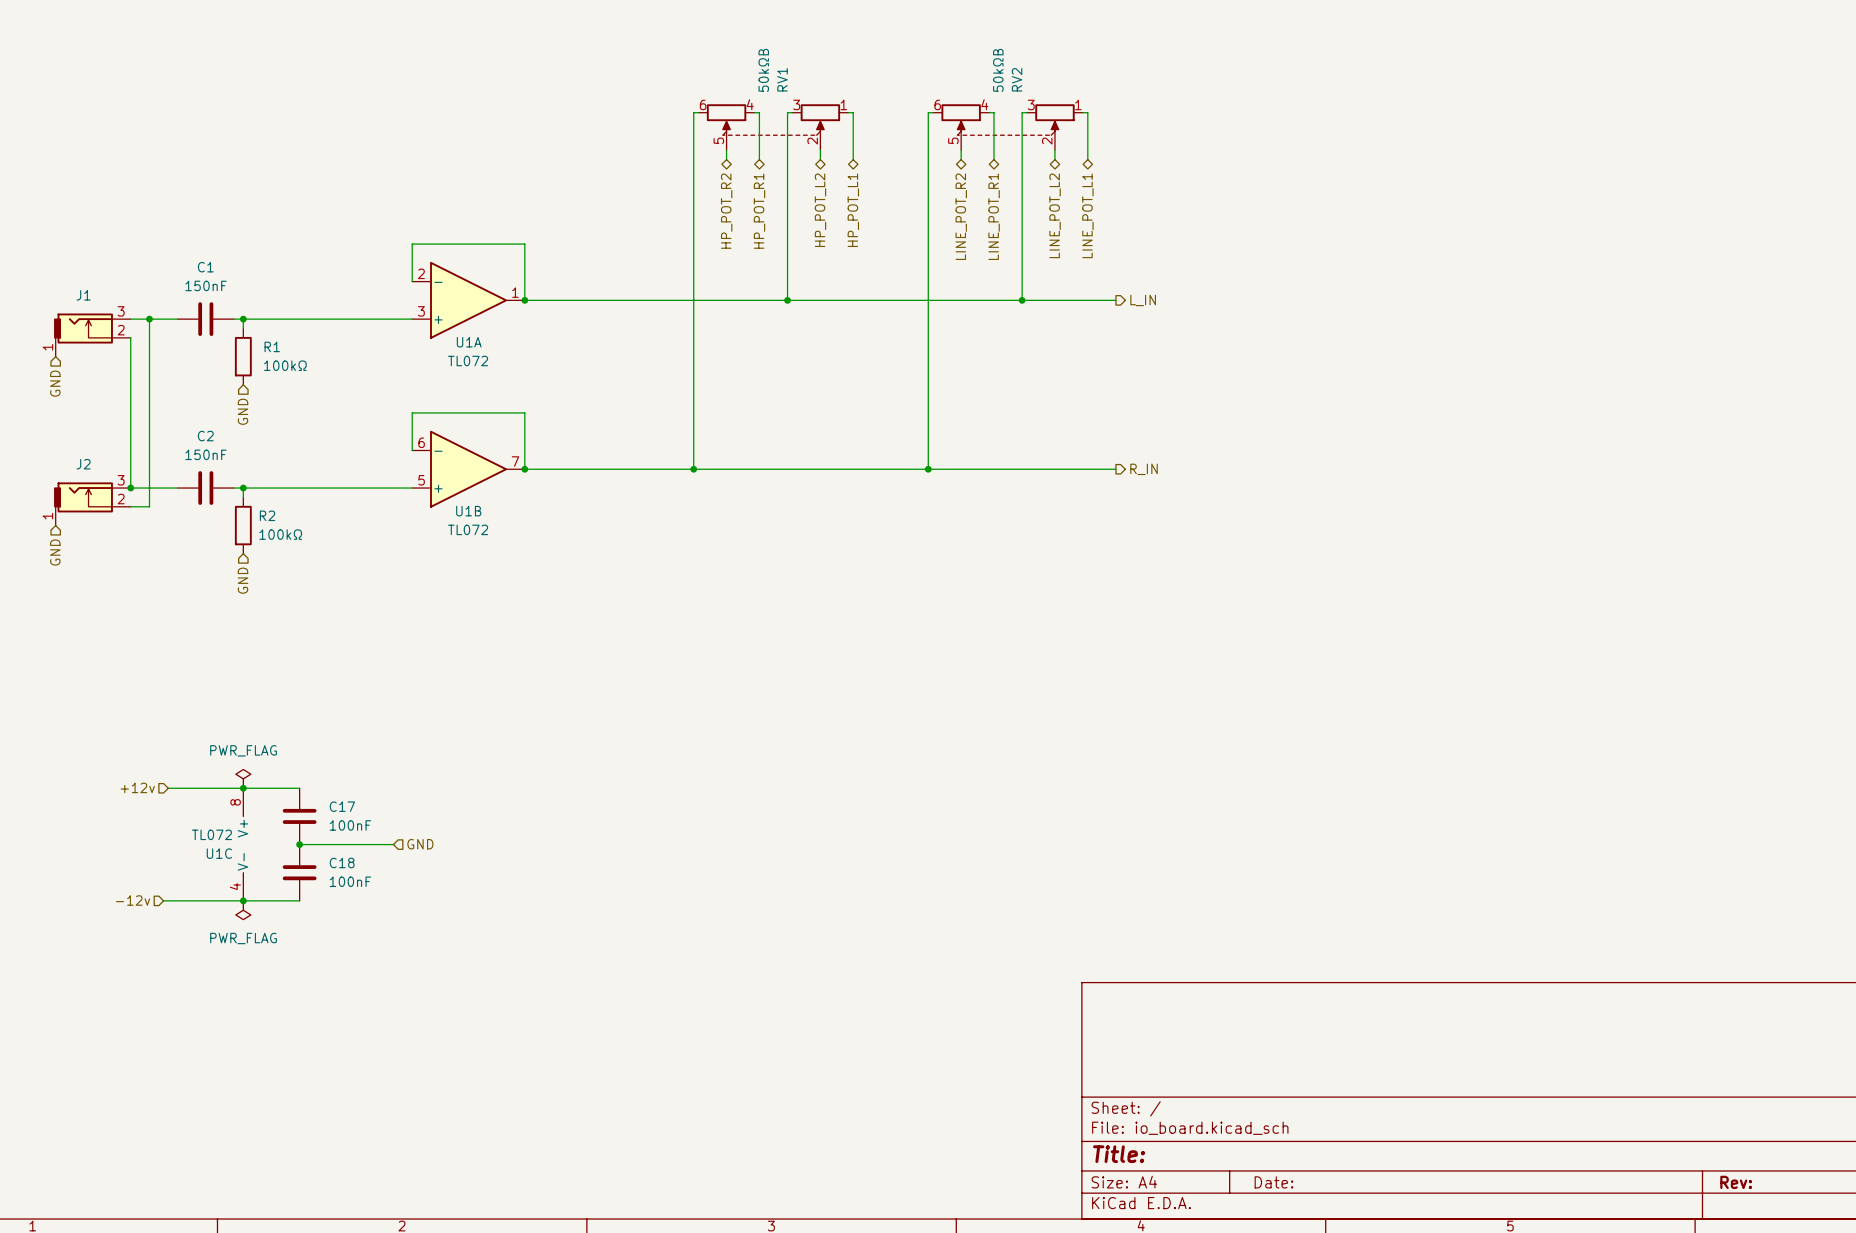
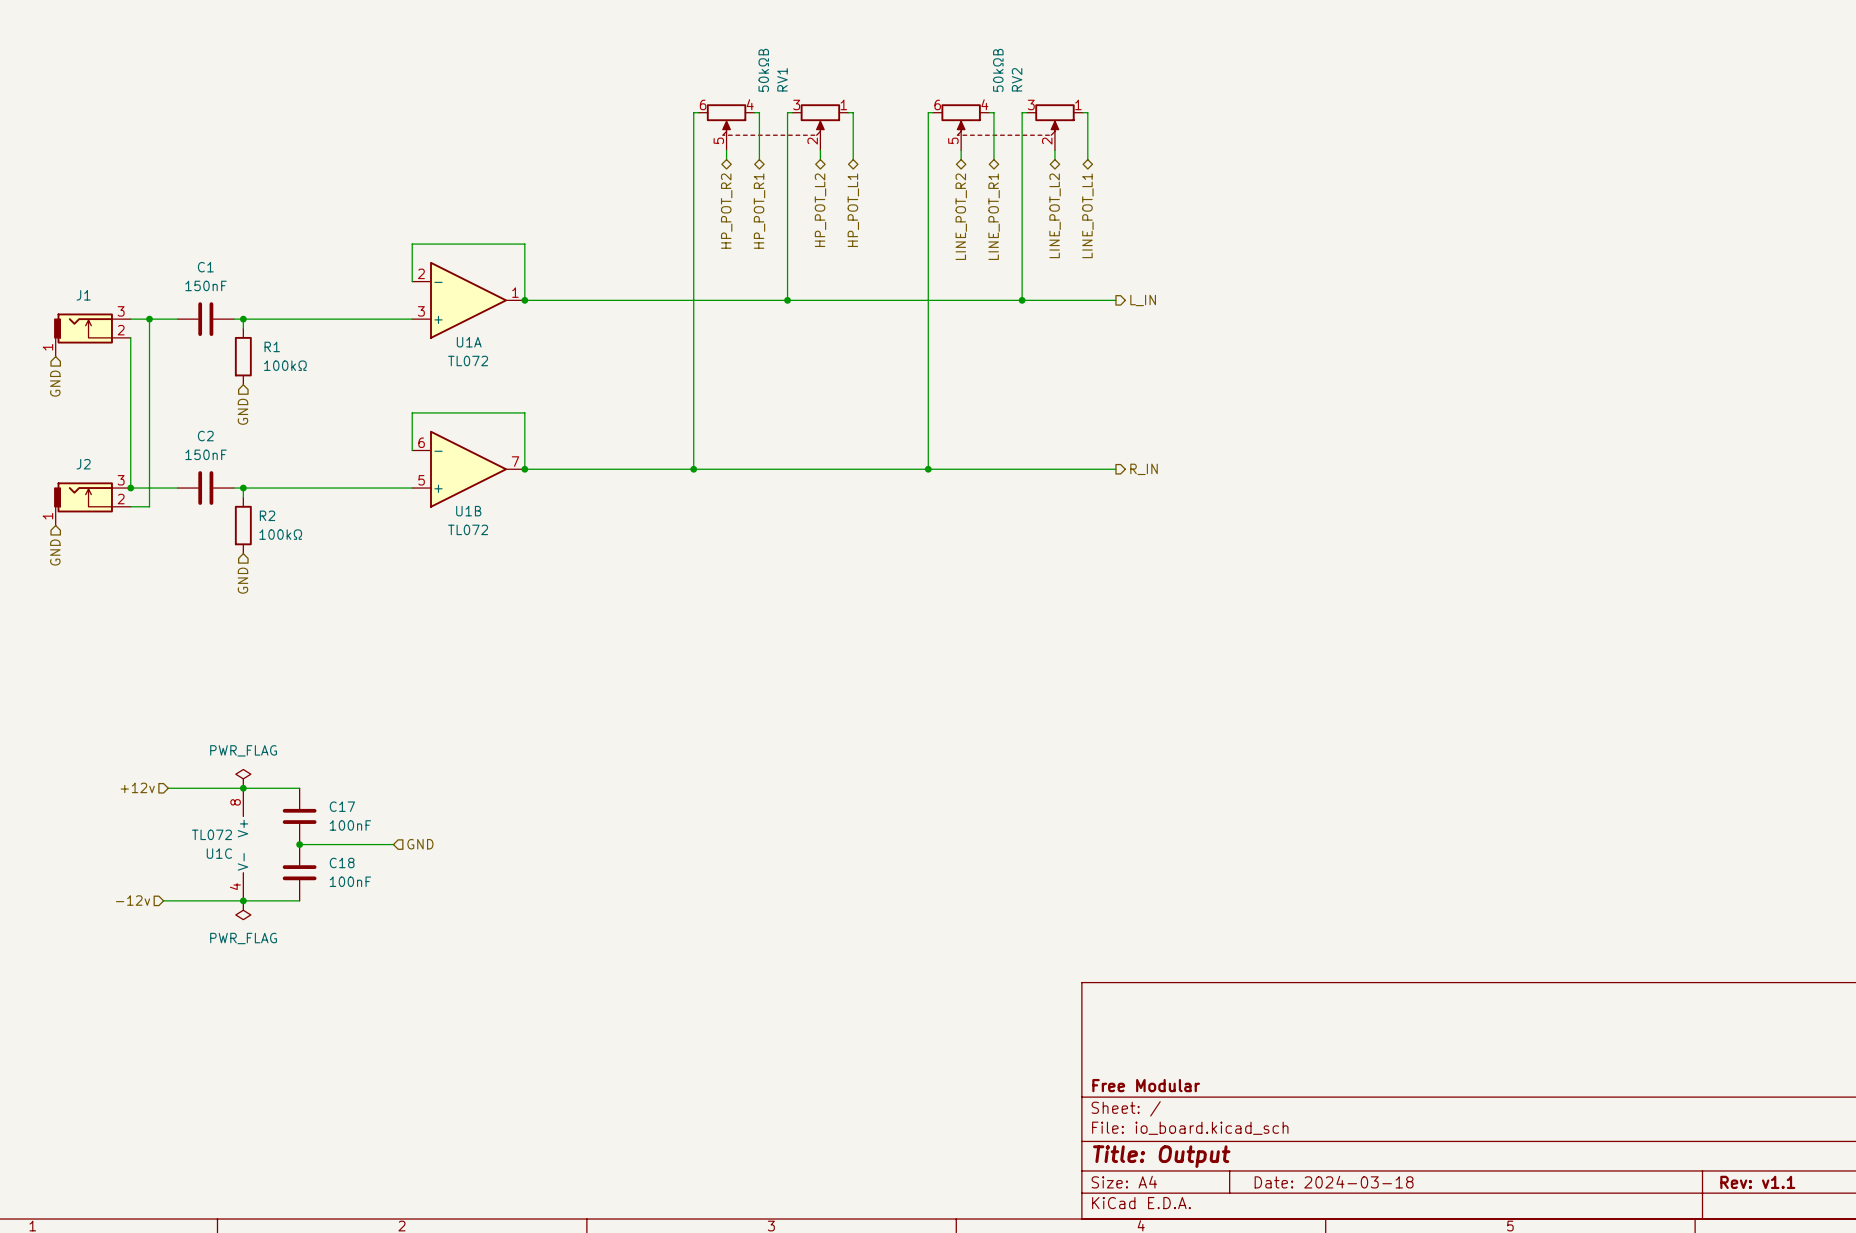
title block: none -> Free Modular (1146, 1085)
title block: Title: (1119, 1154) -> Title: Output (1161, 1156)
title block: Date: (1273, 1182) -> Date: 2024-03-18 (1334, 1182)
title block: Rev: (1736, 1182) -> Rev: v1.1 (1757, 1182)

